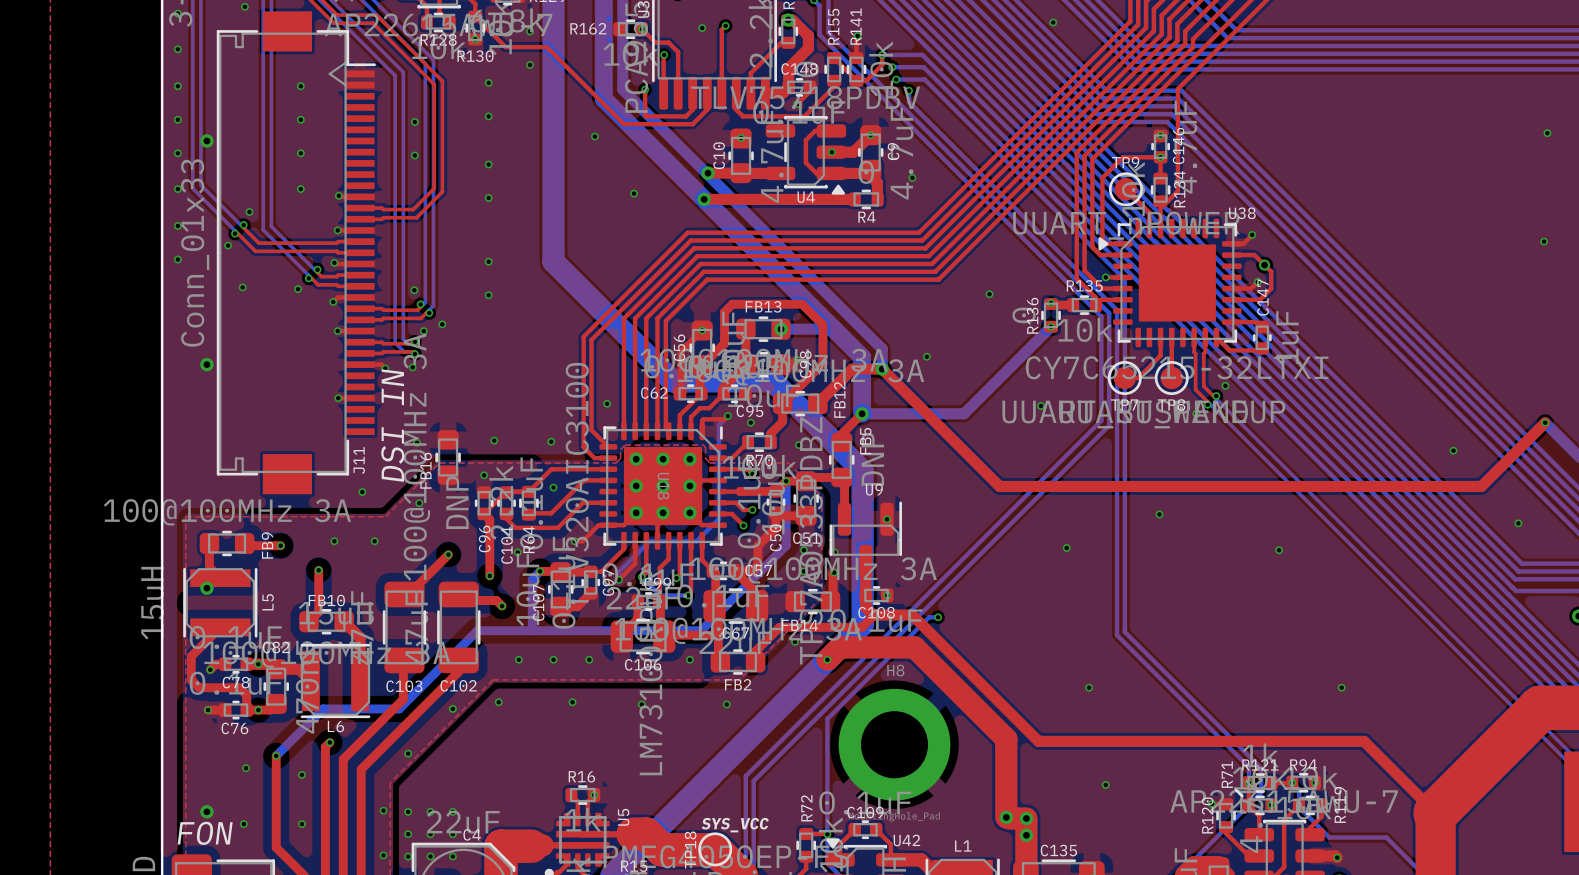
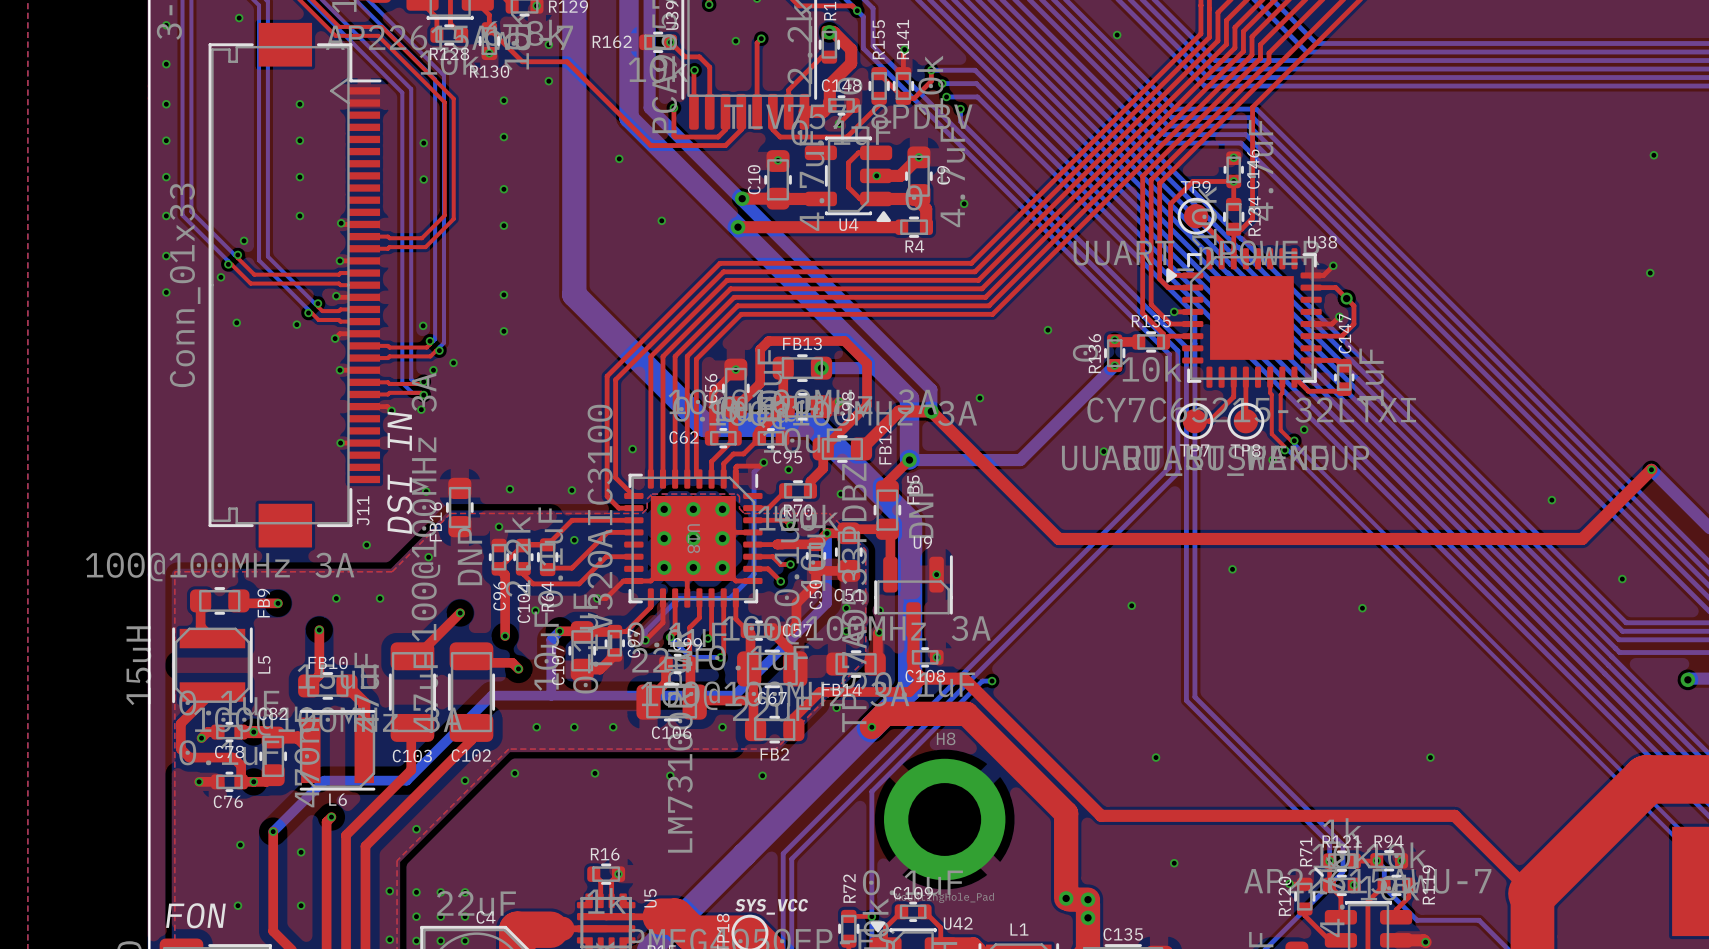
via: (206, 141) -> none
via: (206, 364) -> none
via: (206, 588) -> none
via: (206, 811) -> none

